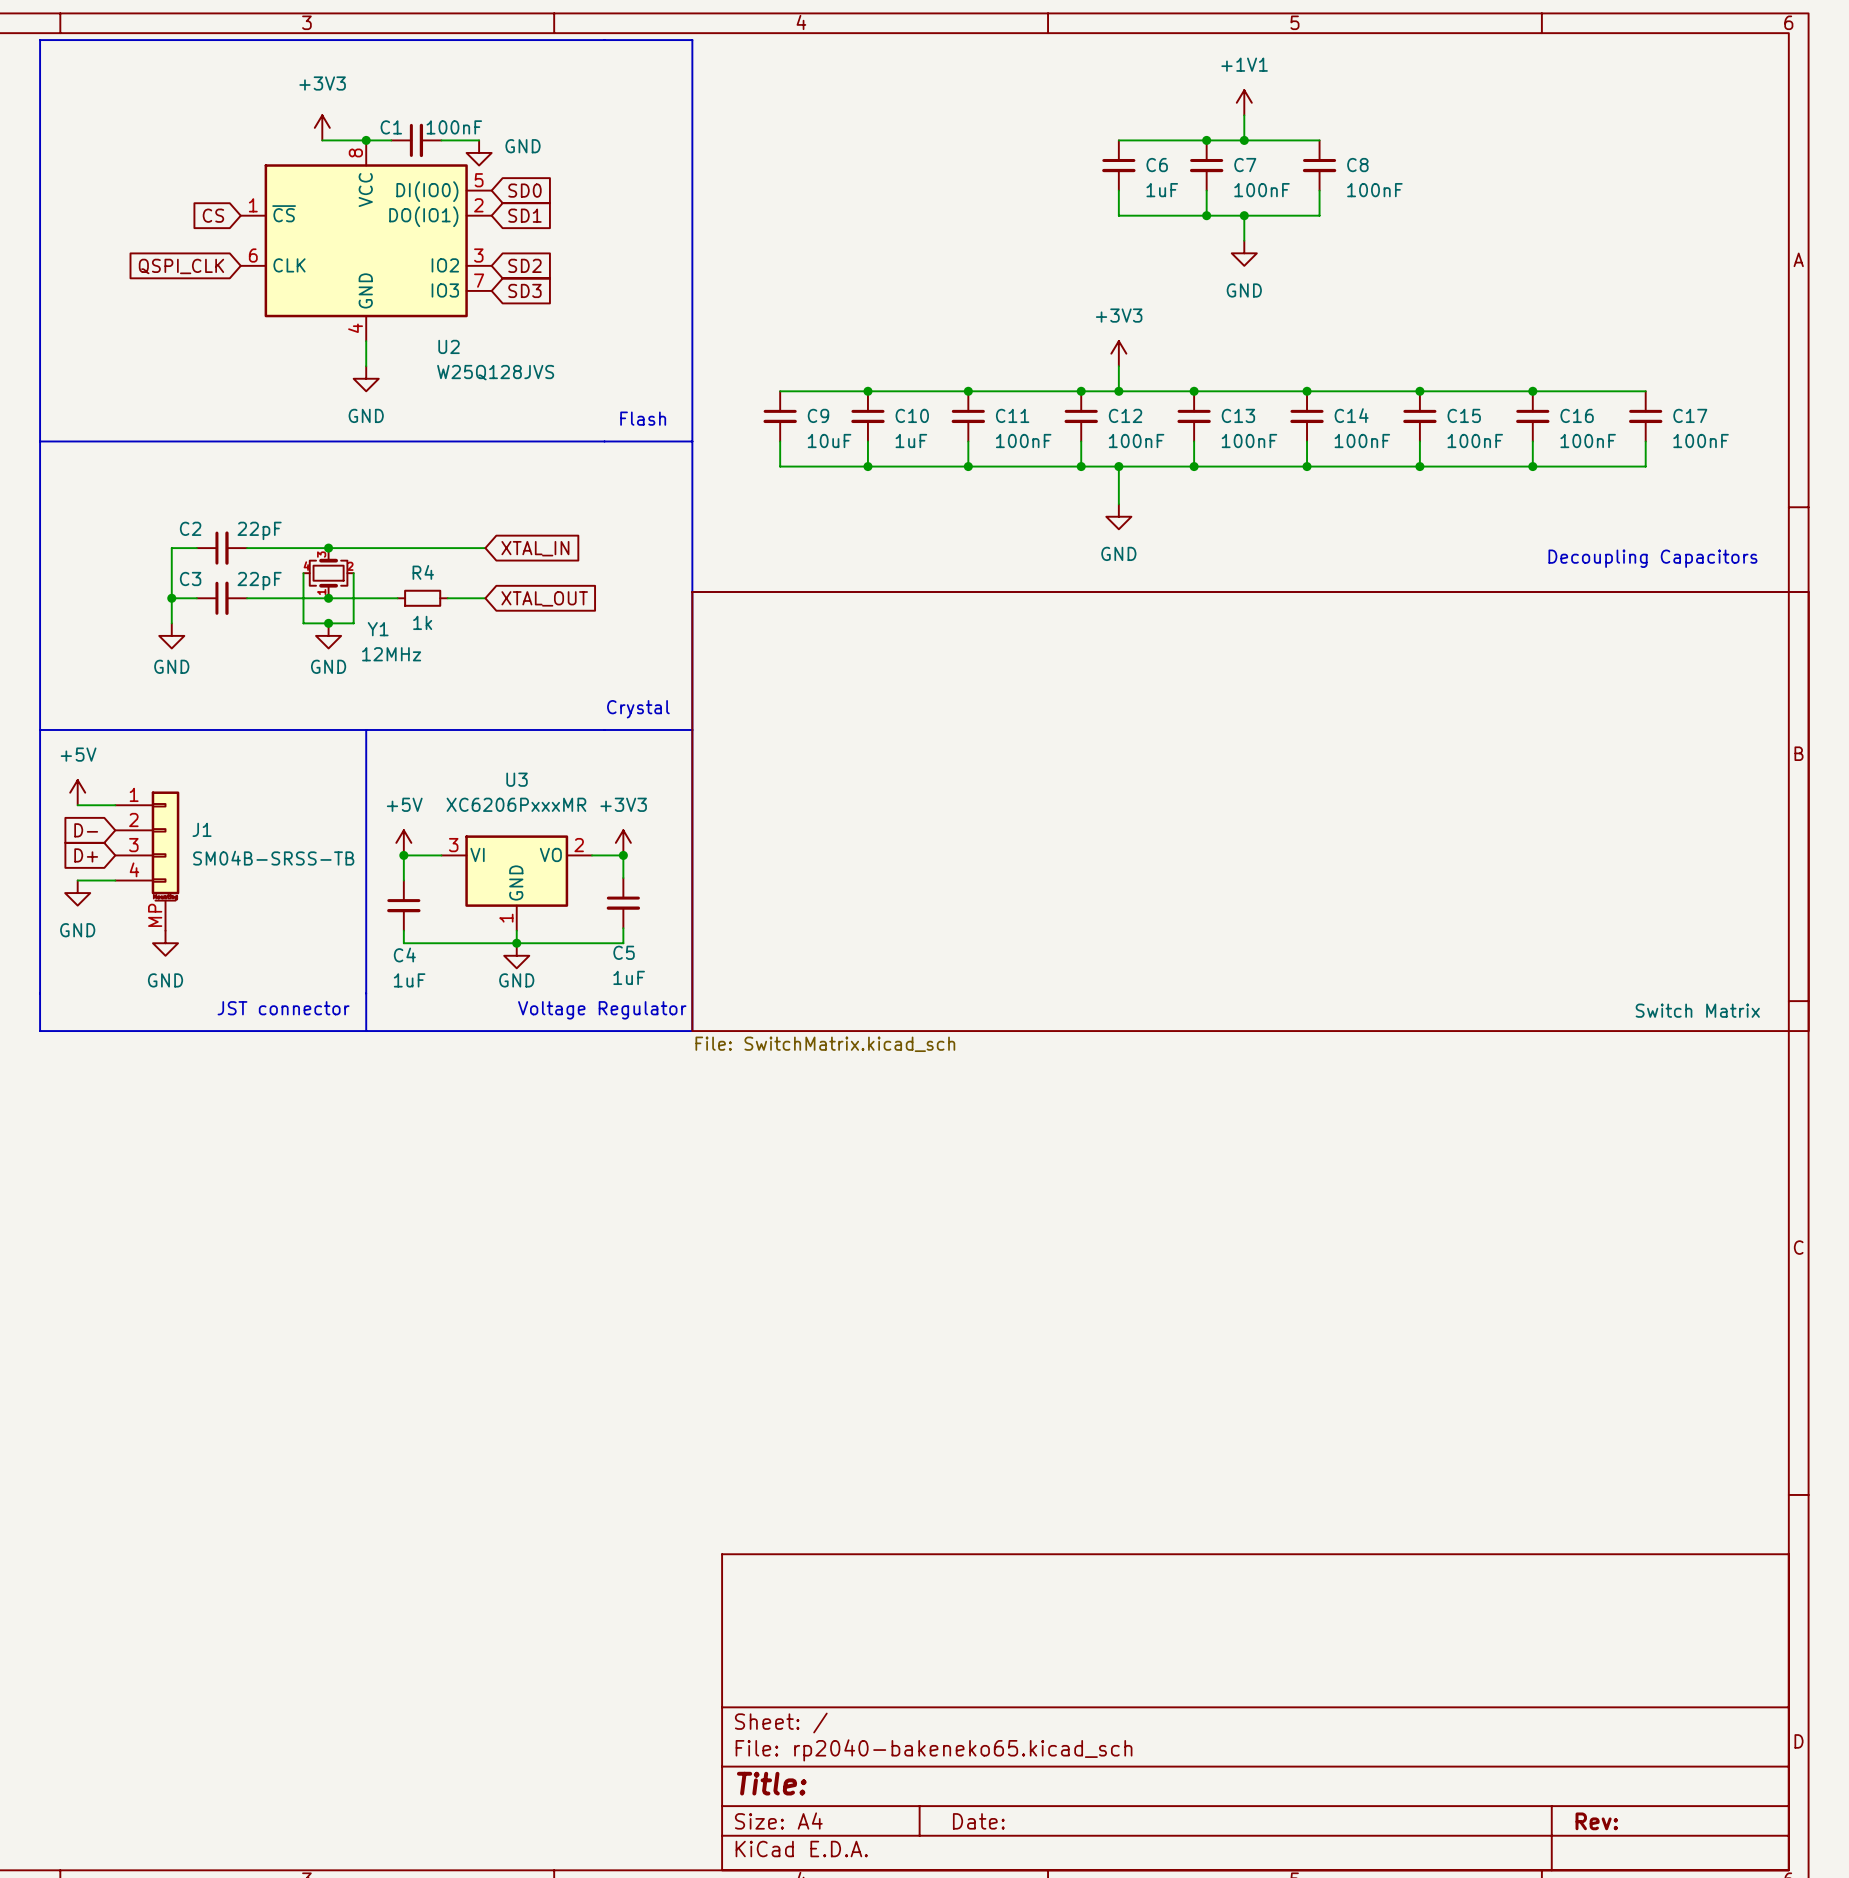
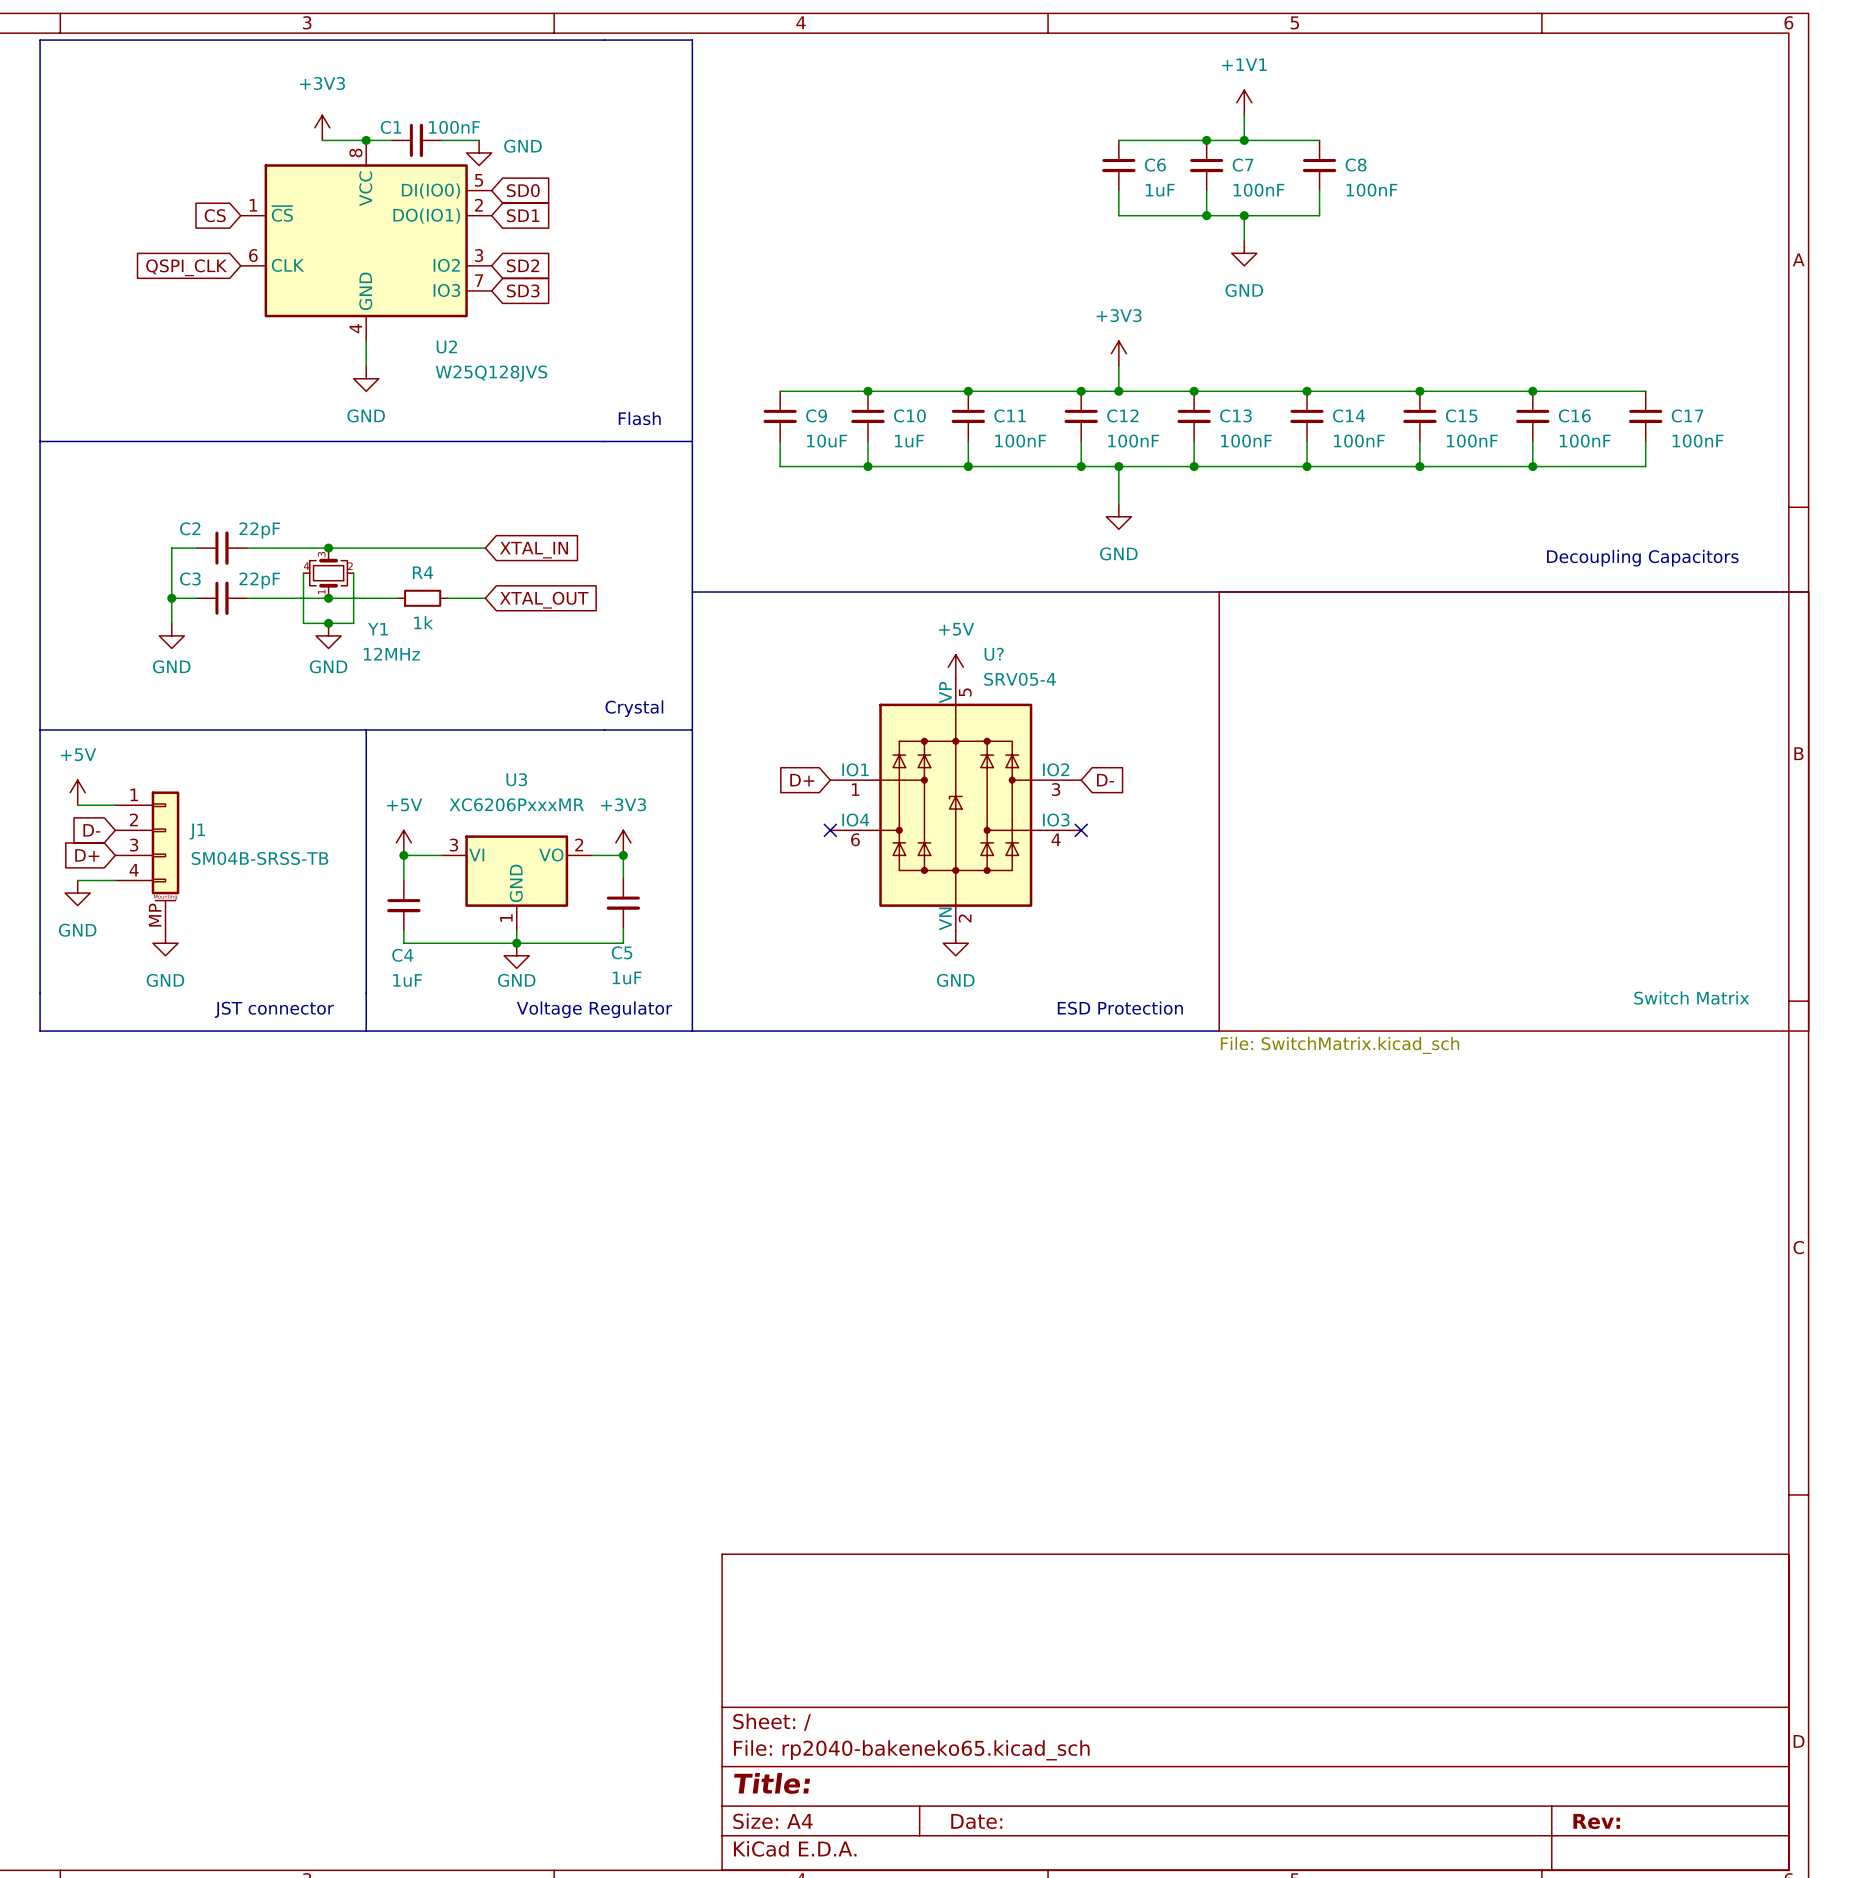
power symbol: none -> +5V (955, 667)
global label: none -> D+ (802, 780)
global label: none -> D- (1105, 780)
U?: none -> SRV05-4 (955, 805)
sheet Switch Matrix: File: SwitchMatrix.kicad_sch (1250, 811) -> none
sheet Switch Matrix: none -> File: SwitchMatrix.kicad_sch (1513, 811)
no-connect mark: none -> (830, 830)
no-connect mark: none -> (1081, 830)
power symbol: none -> GND (955, 943)
text: none -> ESD Protection (1120, 1008)
line: none -> (692, 1031) (1219, 1031)

